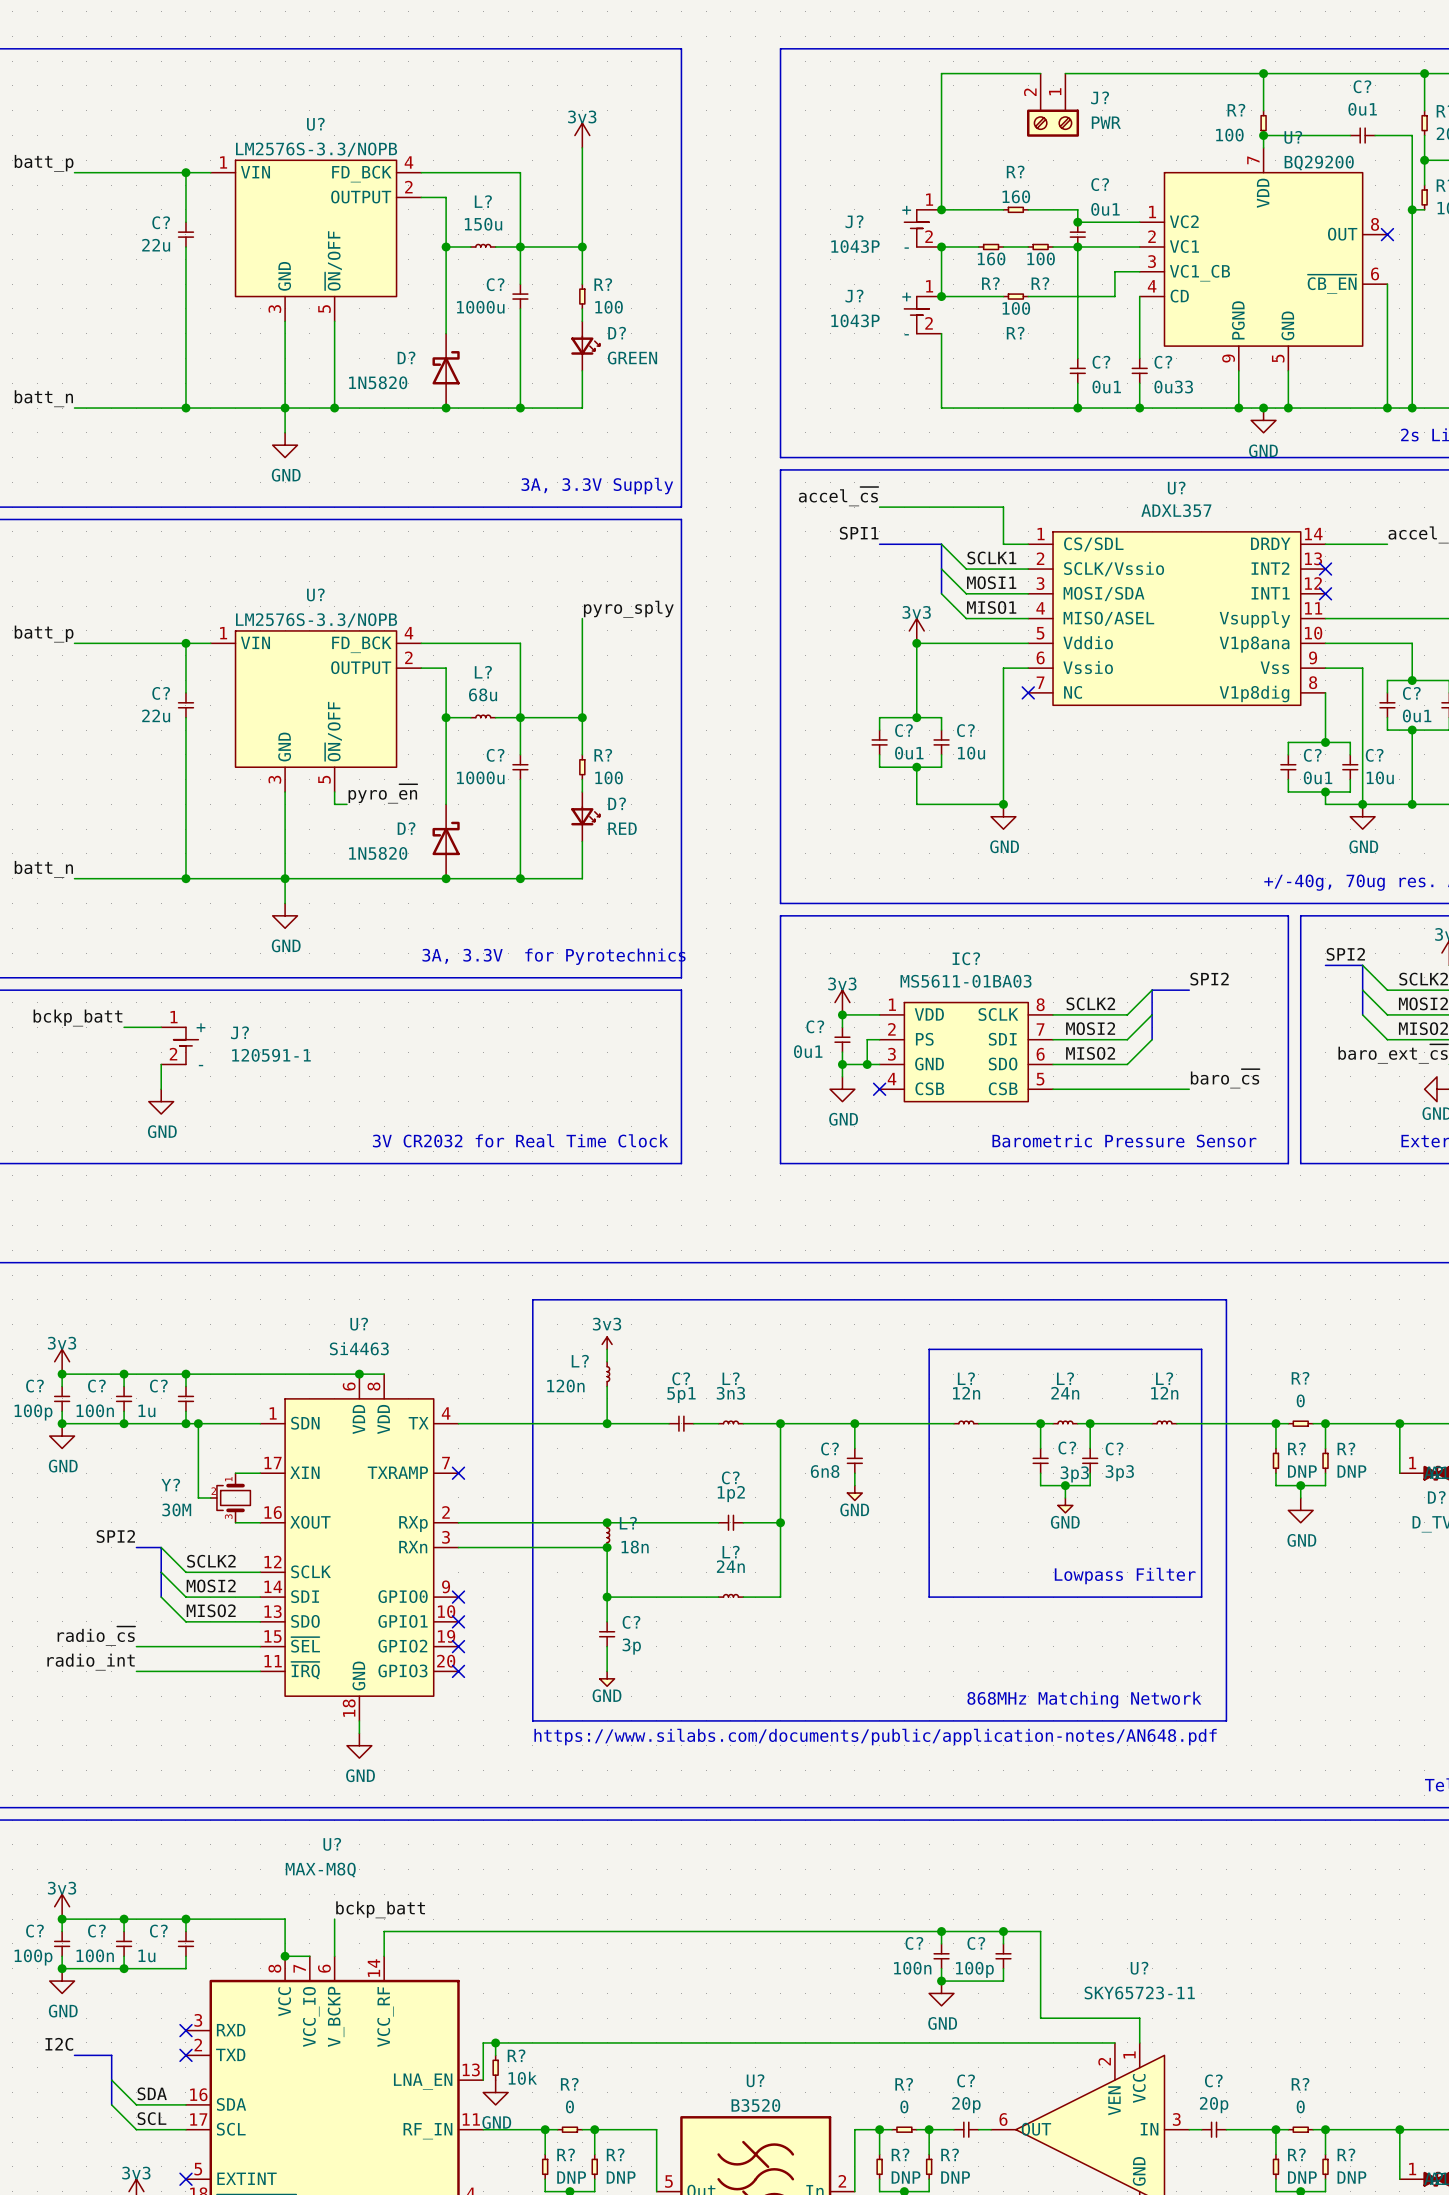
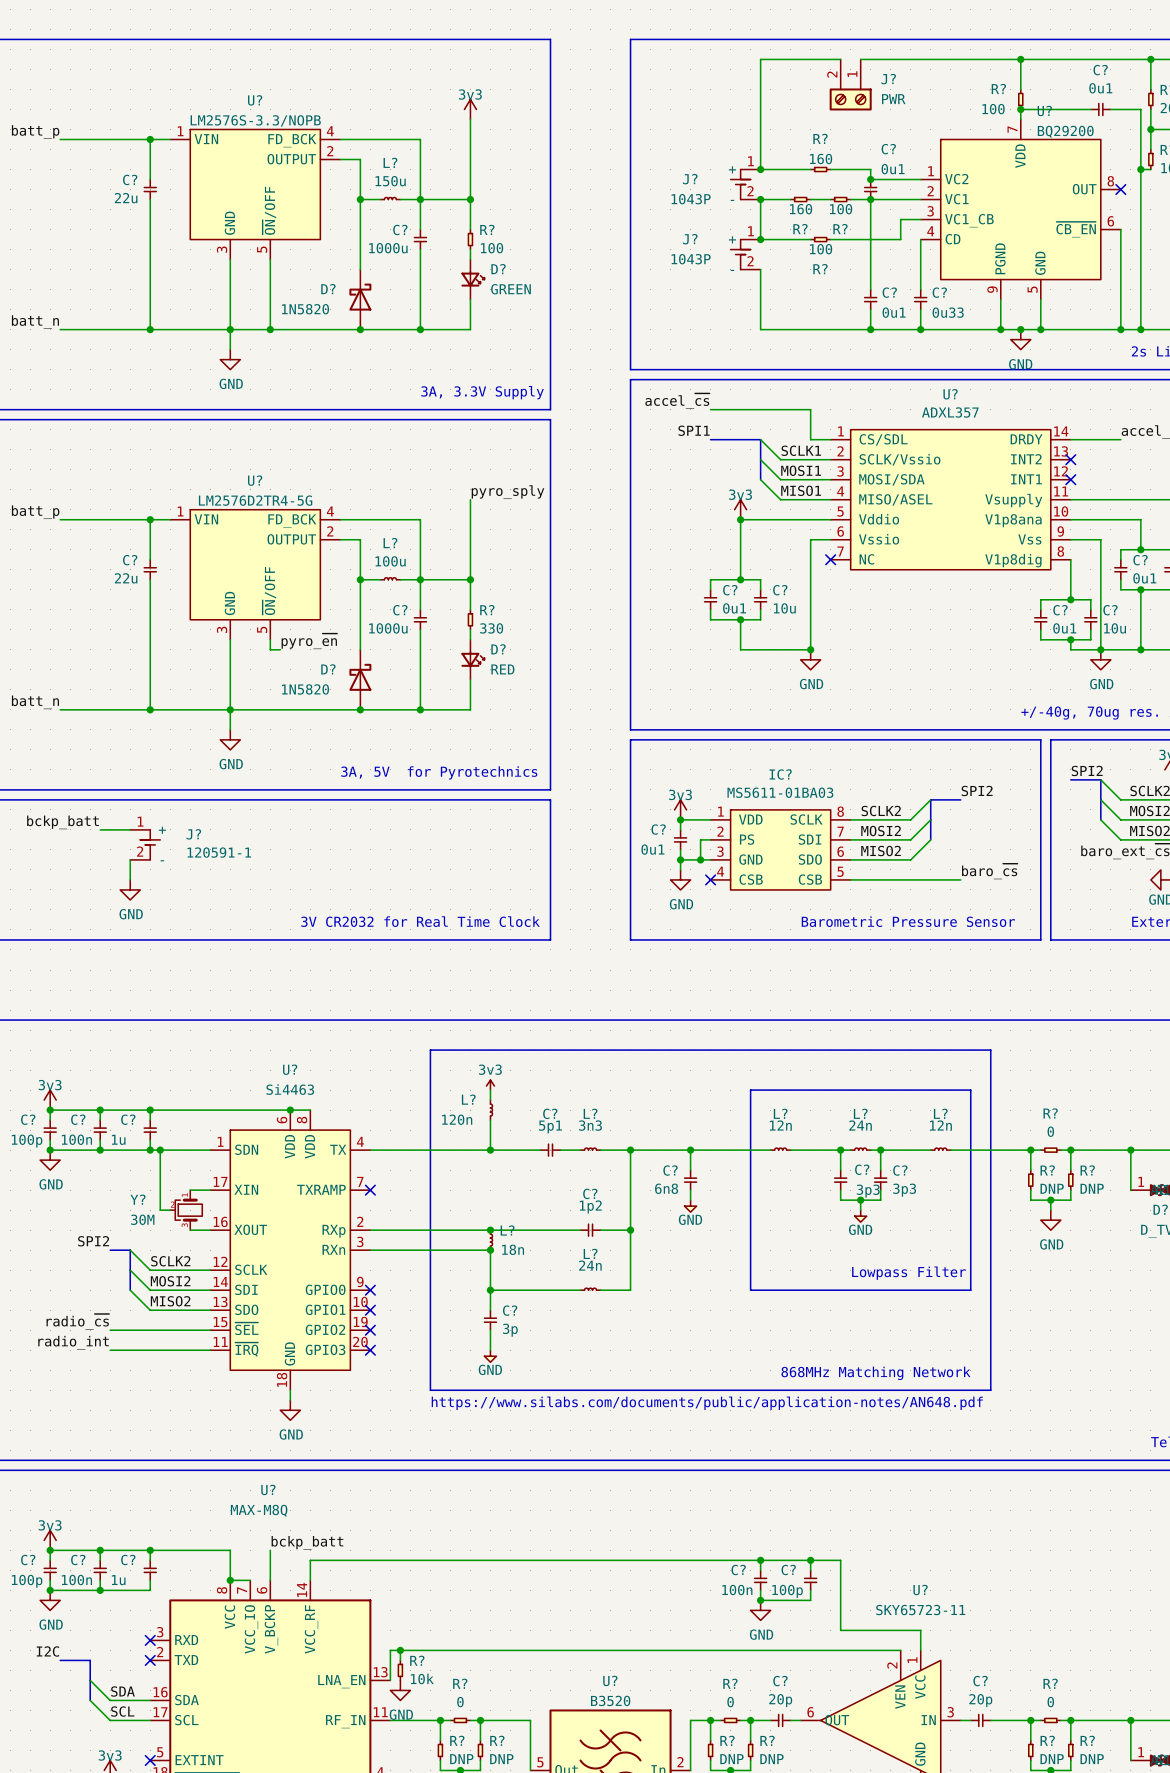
U? value: LM2576S-3.3/NOPB (316, 620) -> LM2576D2TR4-5G (255, 500)
L? value: 68u (483, 694) -> 100u (390, 561)
R? value: 100 (609, 777) -> 330 (491, 628)
text: 3A, 3.3V for Pyrotechnics (554, 956) -> 3A, 5V for Pyrotechnics (439, 772)

